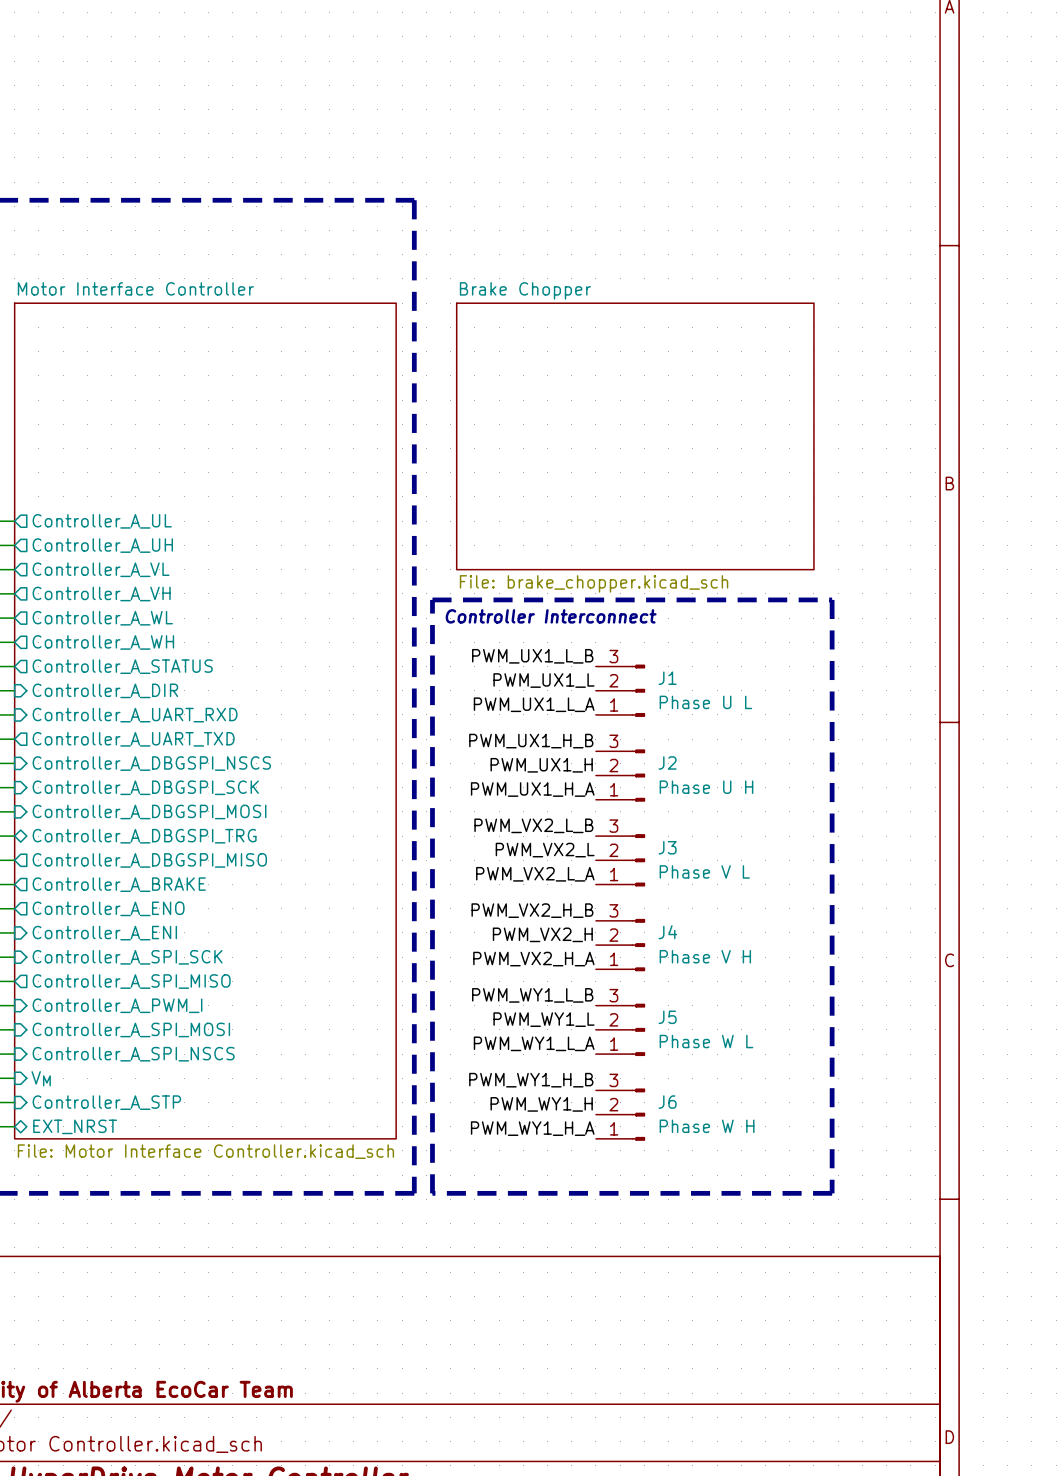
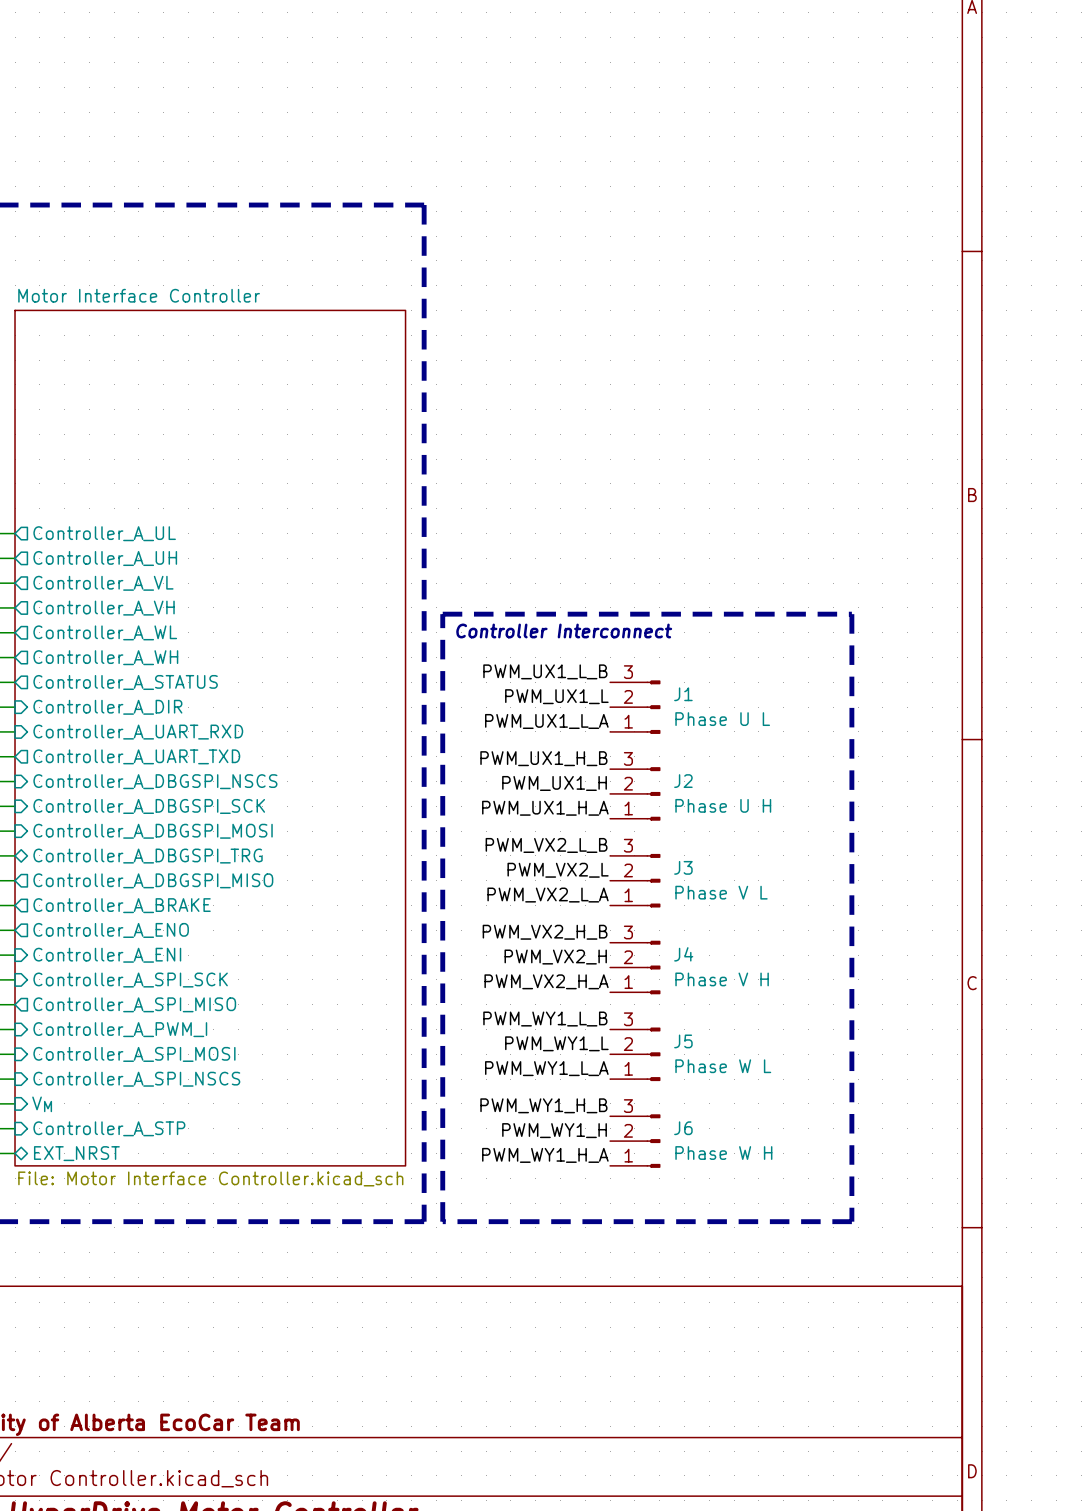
sheet Brake Chopper: File: brake_chopper.kicad_sch (635, 436) -> none

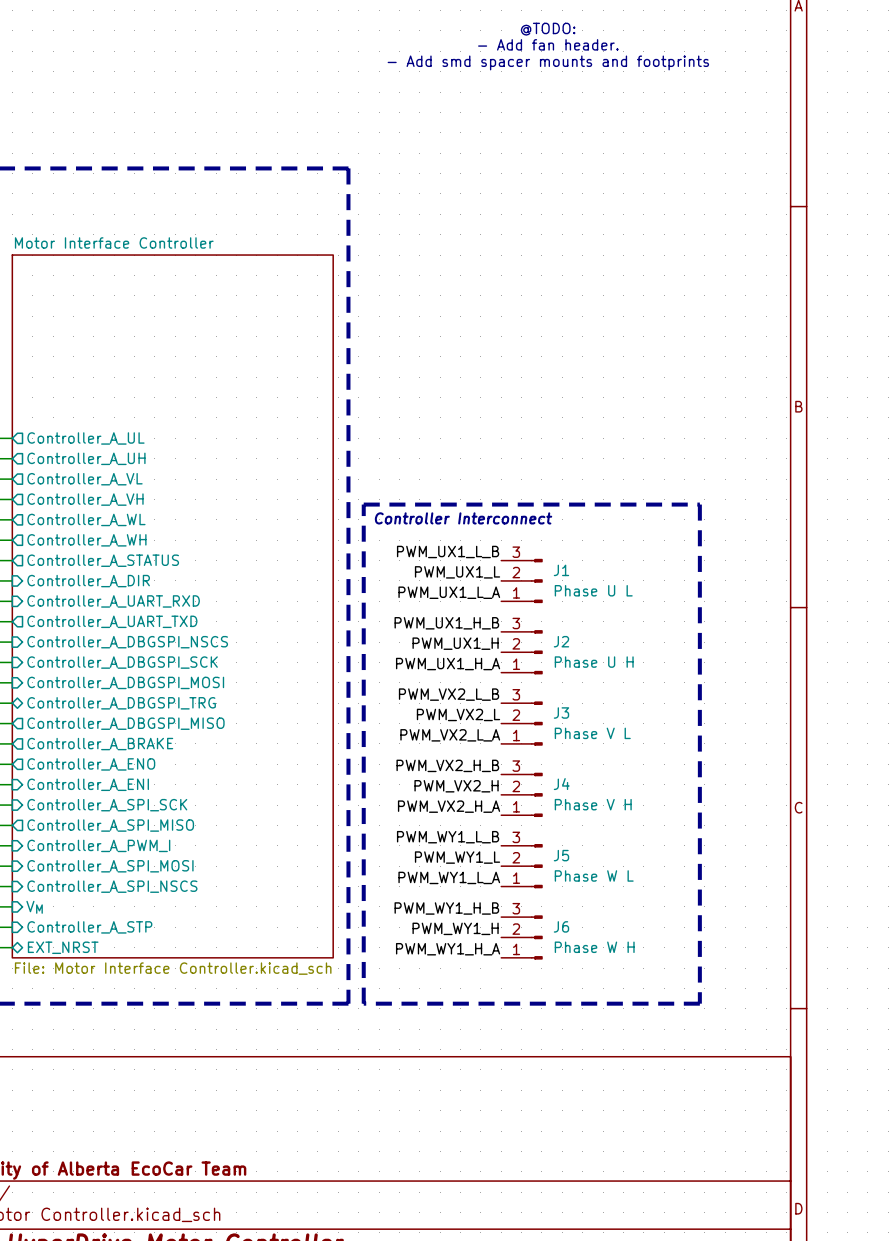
text: none -> @TODO: (548, 29)
text: none -> - Add fan header. (548, 44)
text: none -> - Add smd spacer mounts and footprints (548, 62)

